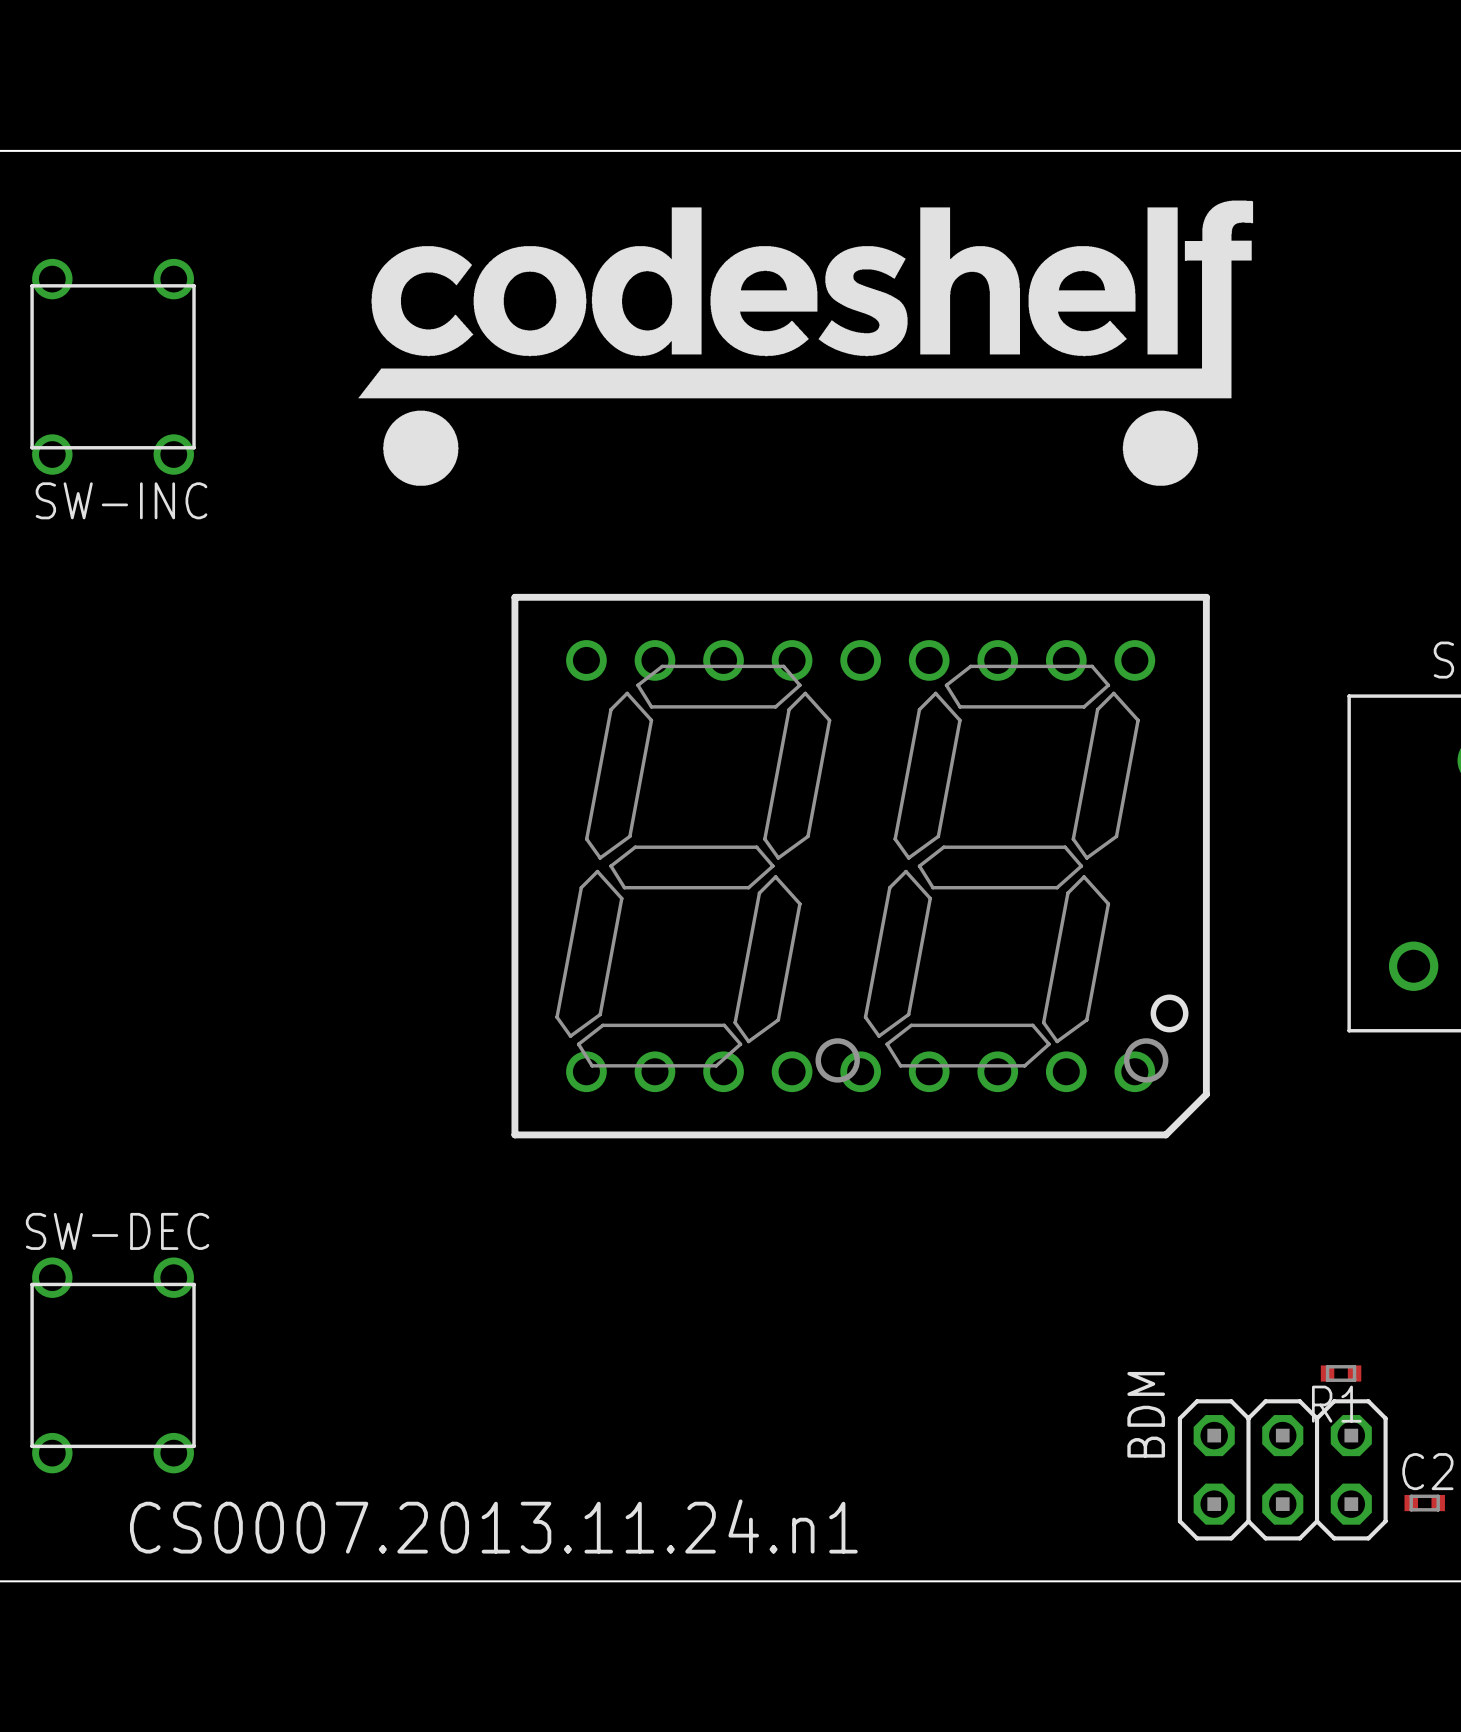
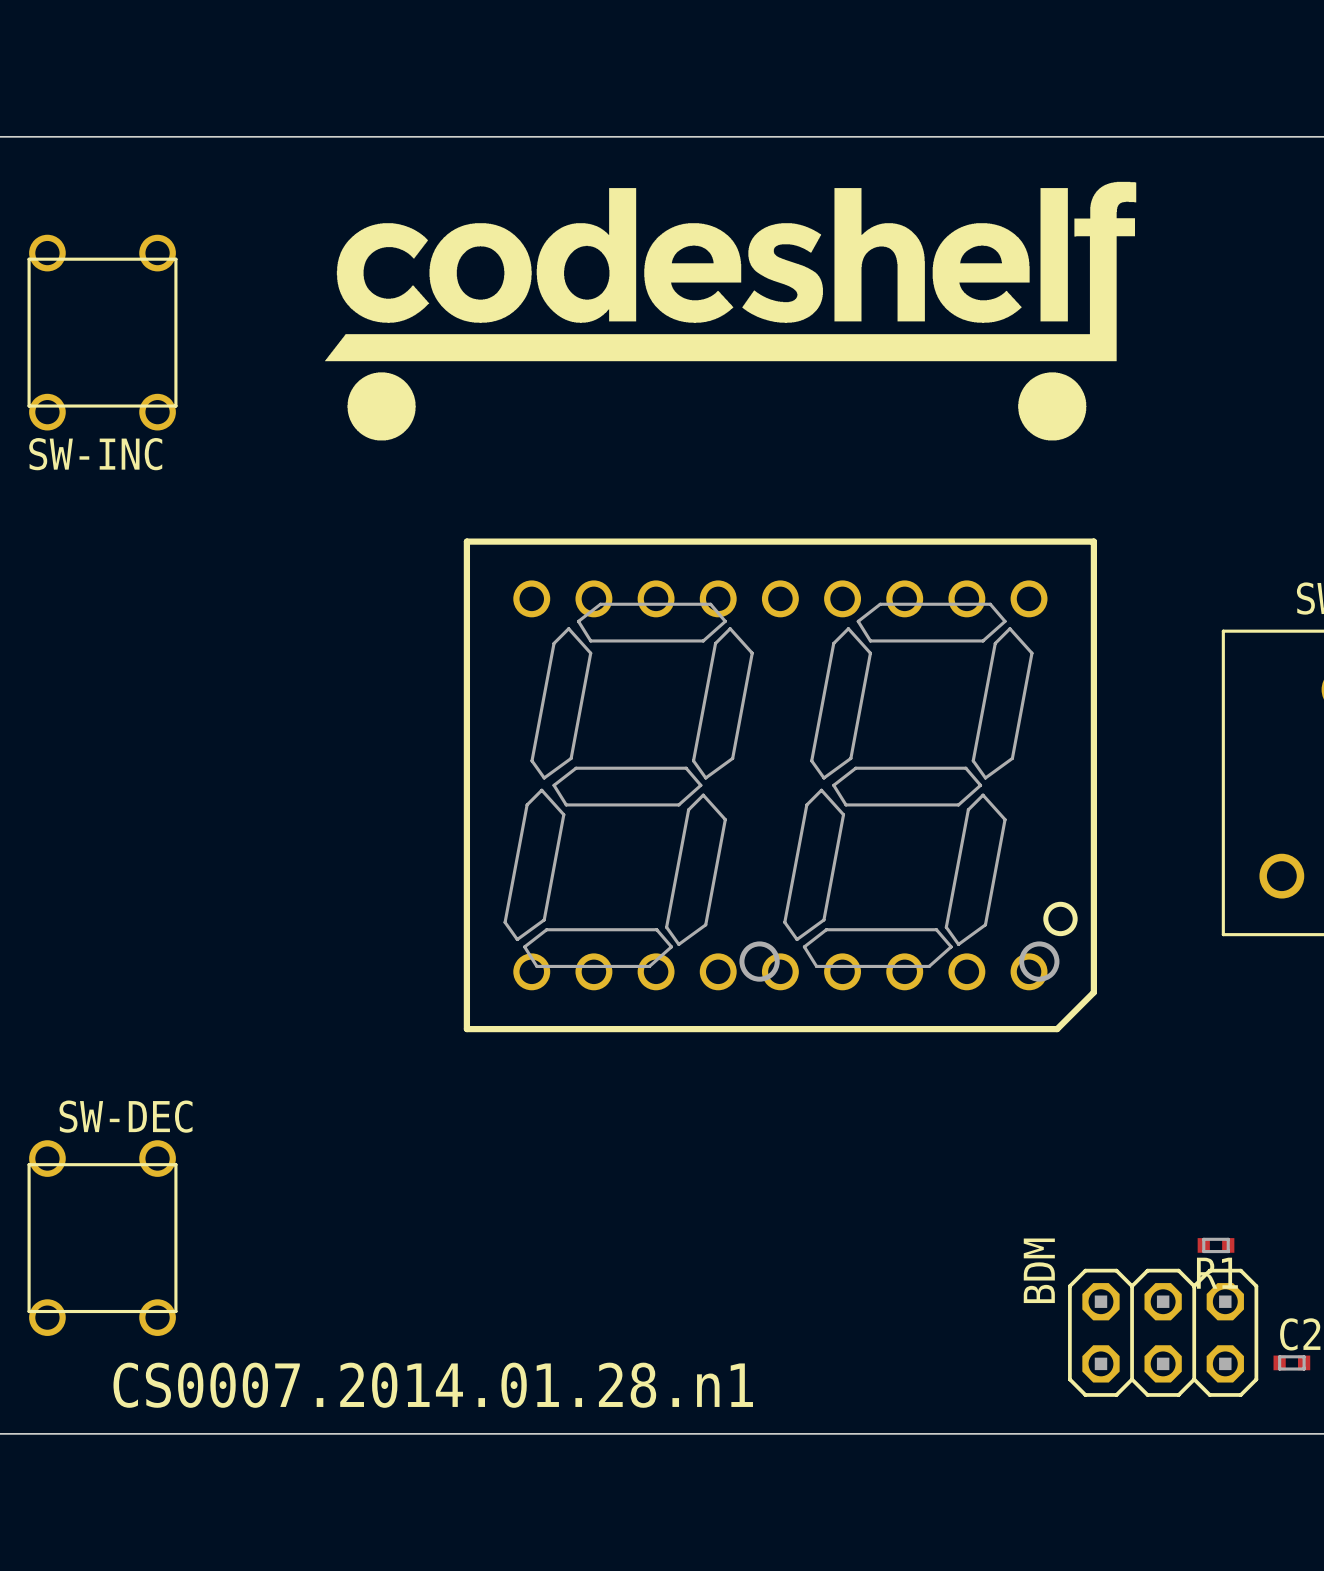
text: CS0007.2013.11.24.n1 (493, 1526) -> CS0007.2014.01.28.n1 (433, 1385)

